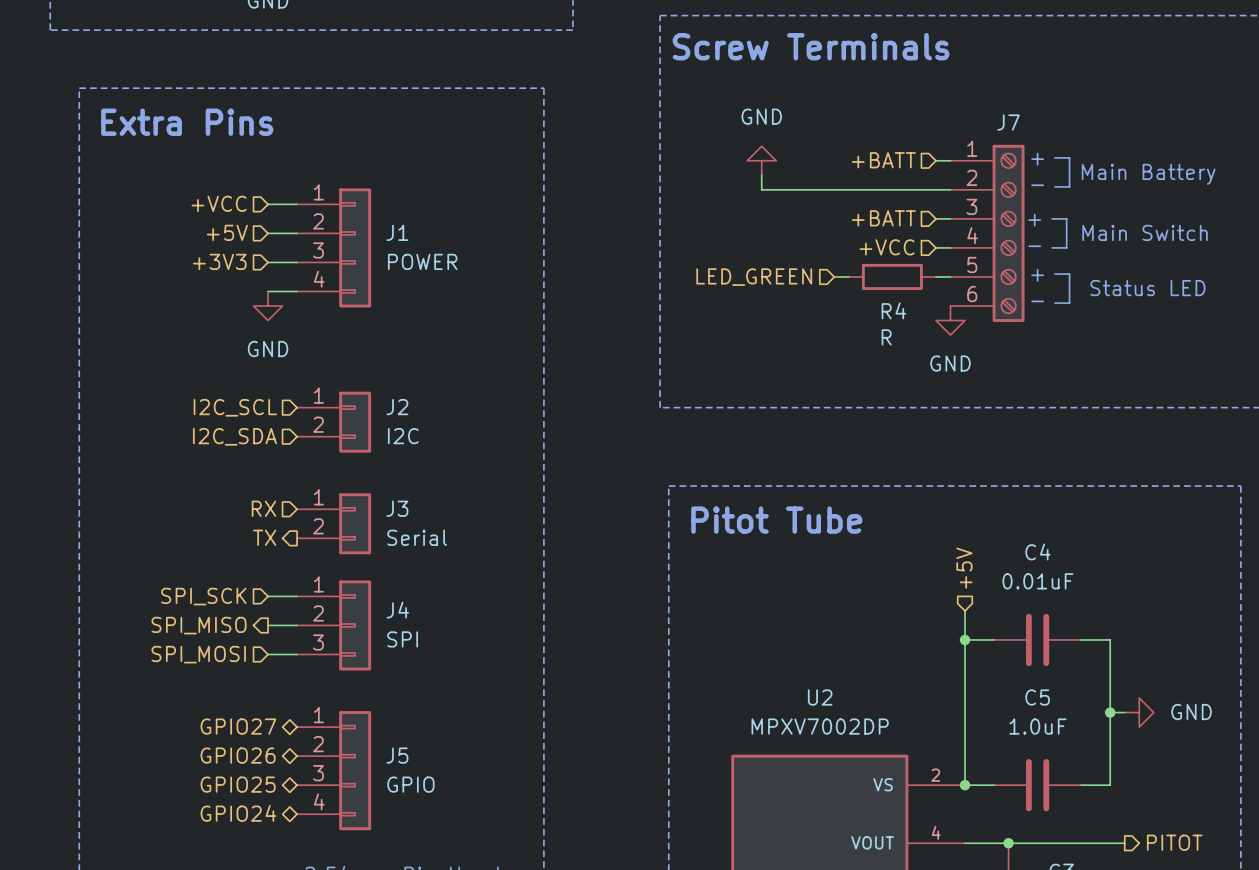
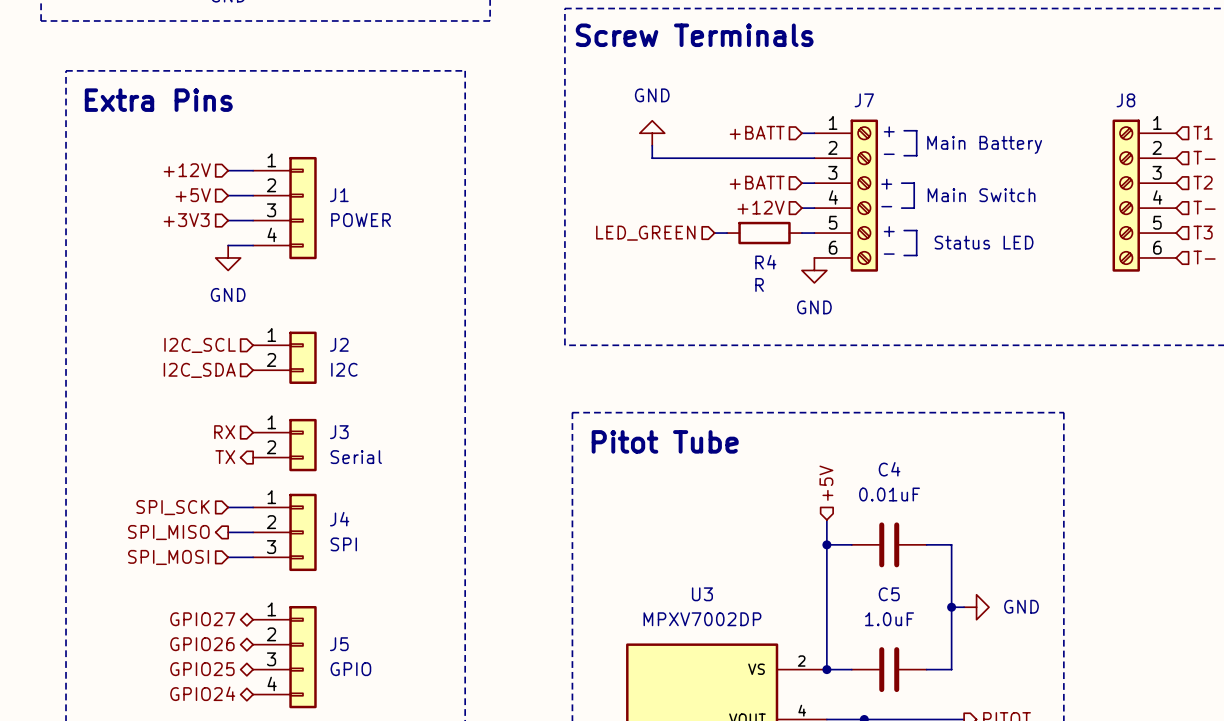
hierarchical label: +VCC (219, 203) -> +12V (187, 170)
hierarchical label: +VCC (886, 247) -> +12V (761, 207)
U2 name: U2 (820, 697) -> U3 (702, 594)

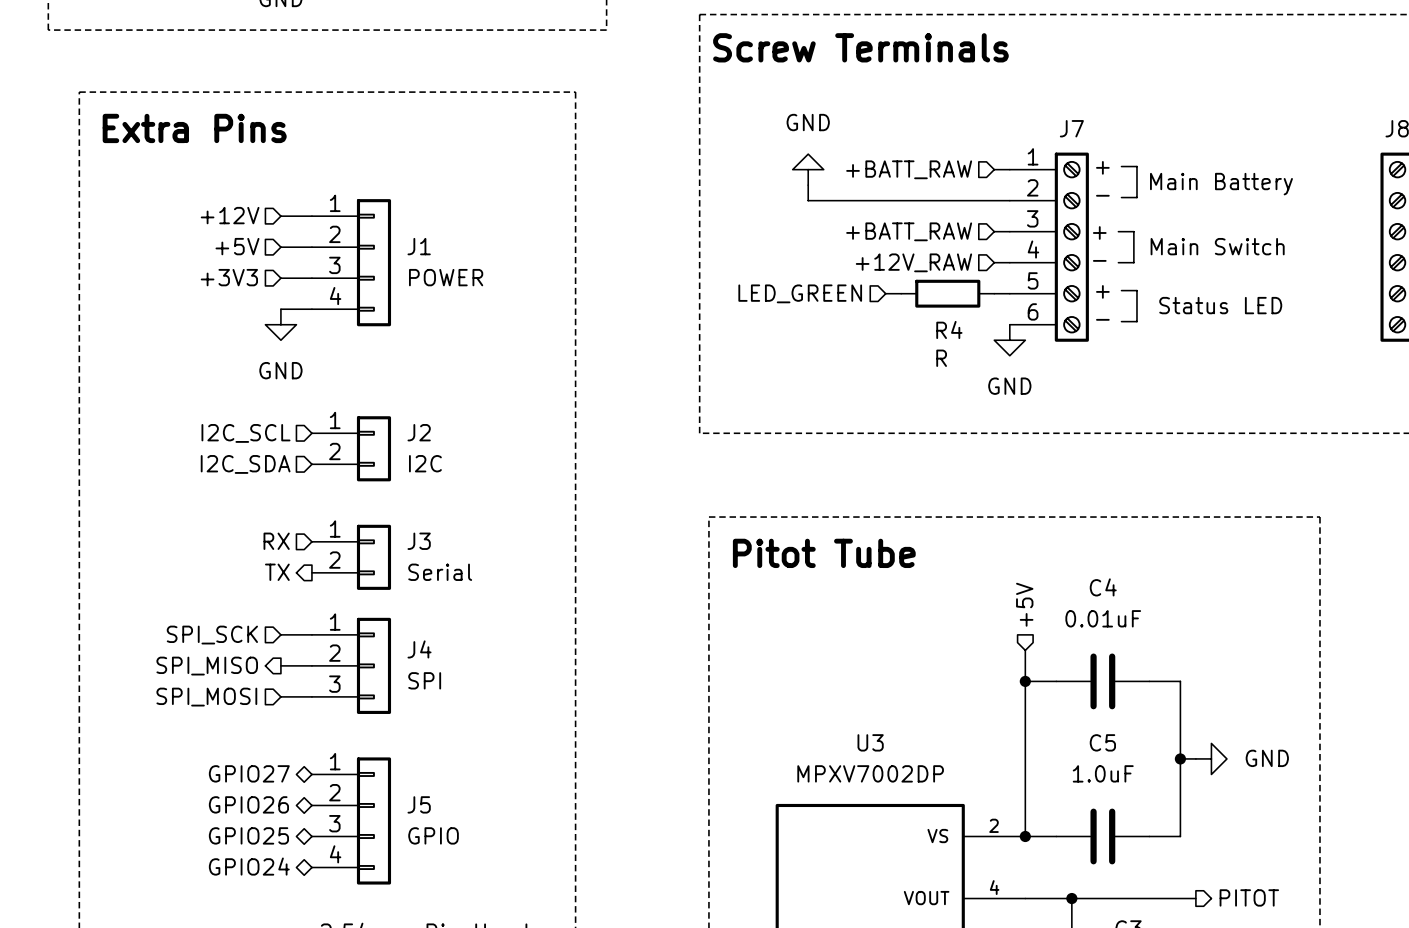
hierarchical label: +BATT (757, 132) -> +BATT_RAW (909, 169)
hierarchical label: +BATT (757, 182) -> +BATT_RAW (909, 231)
hierarchical label: +12V (761, 207) -> +12V_RAW (913, 262)

